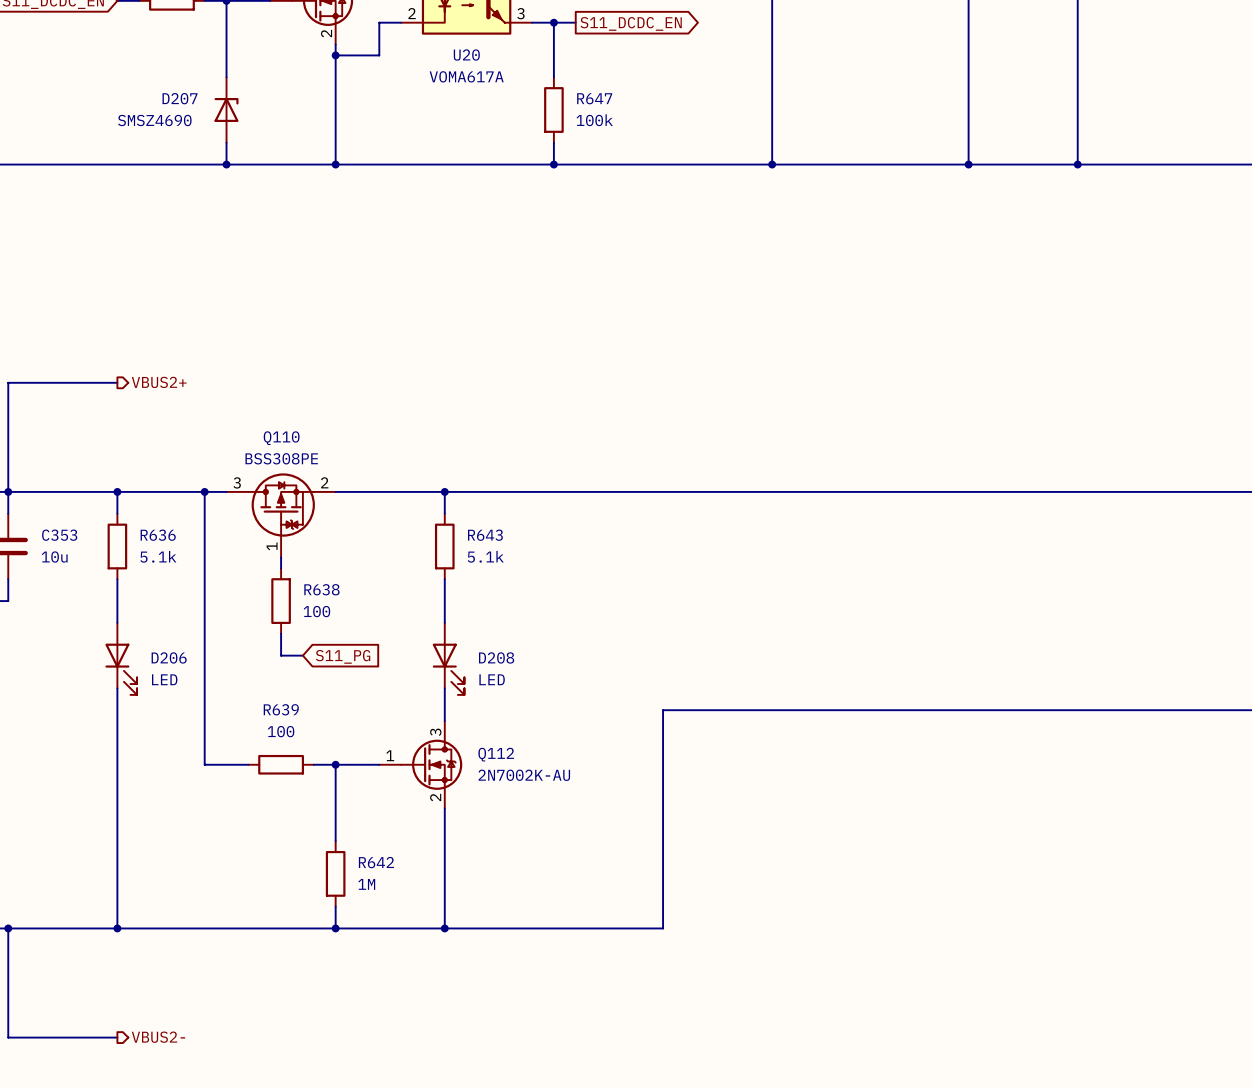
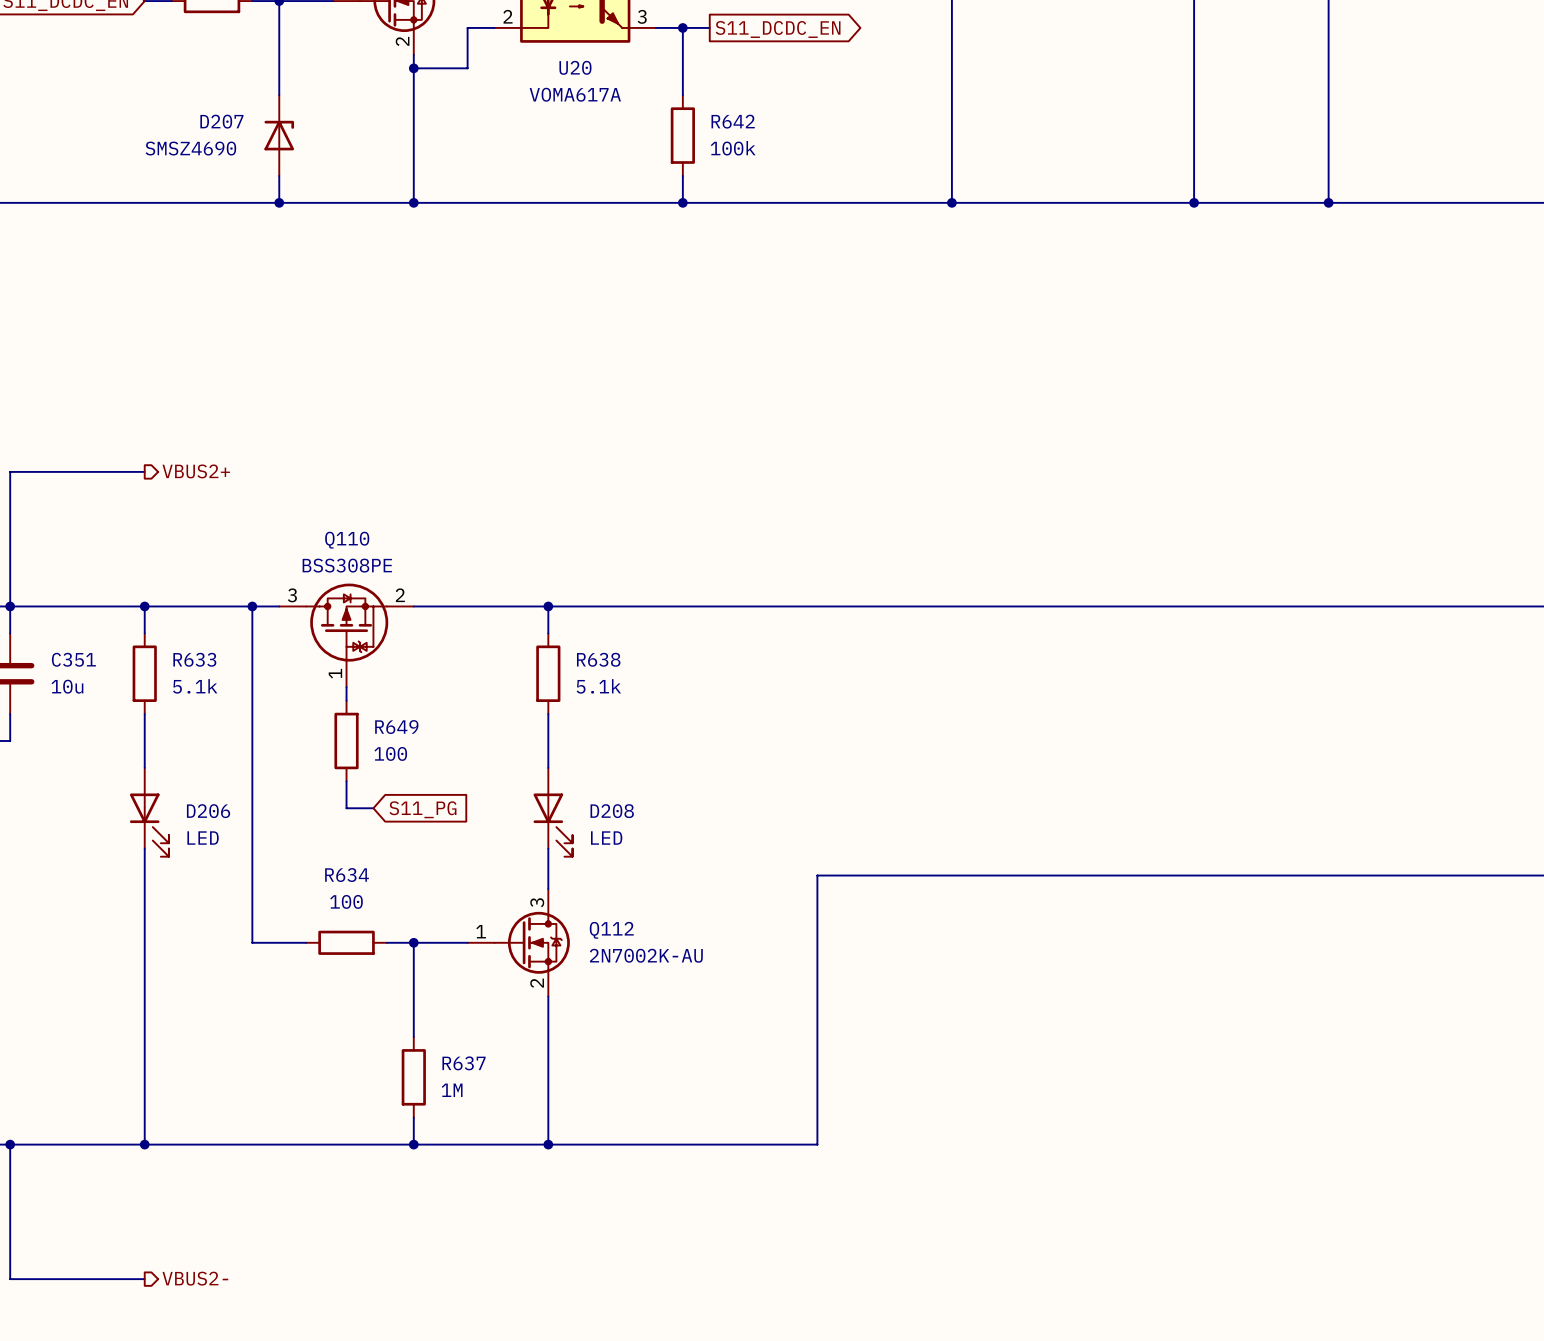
R647 name: R647 (594, 98) -> R642 (733, 121)
C353 name: C353 (59, 535) -> C351 (73, 659)
R636 name: R636 (158, 535) -> R633 (194, 659)
R643 name: R643 (485, 535) -> R638 (598, 659)
R638 name: R638 (321, 589) -> R649 (396, 727)
R639 name: R639 (281, 709) -> R634 (347, 875)
R642 name: R642 (376, 862) -> R637 (464, 1063)

